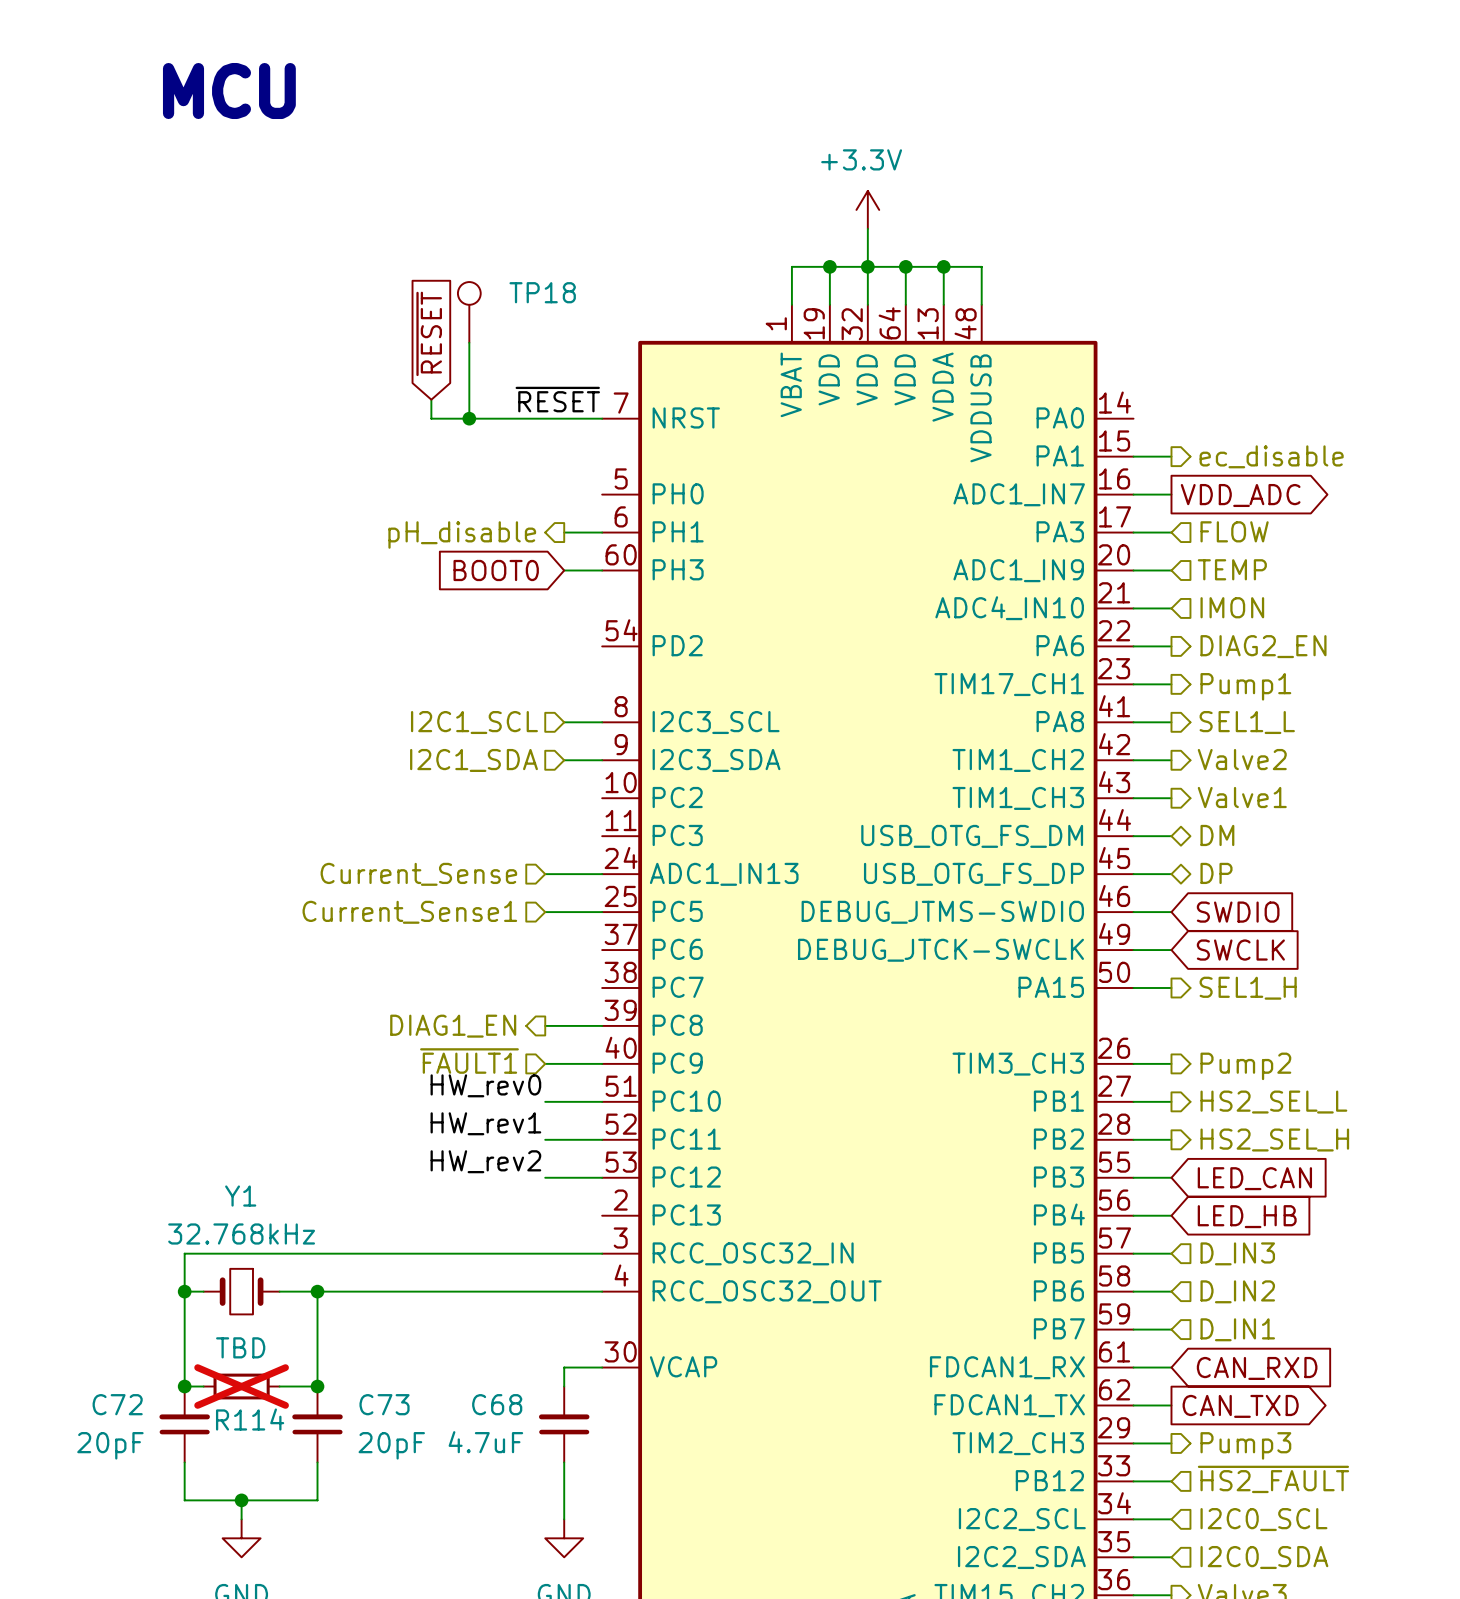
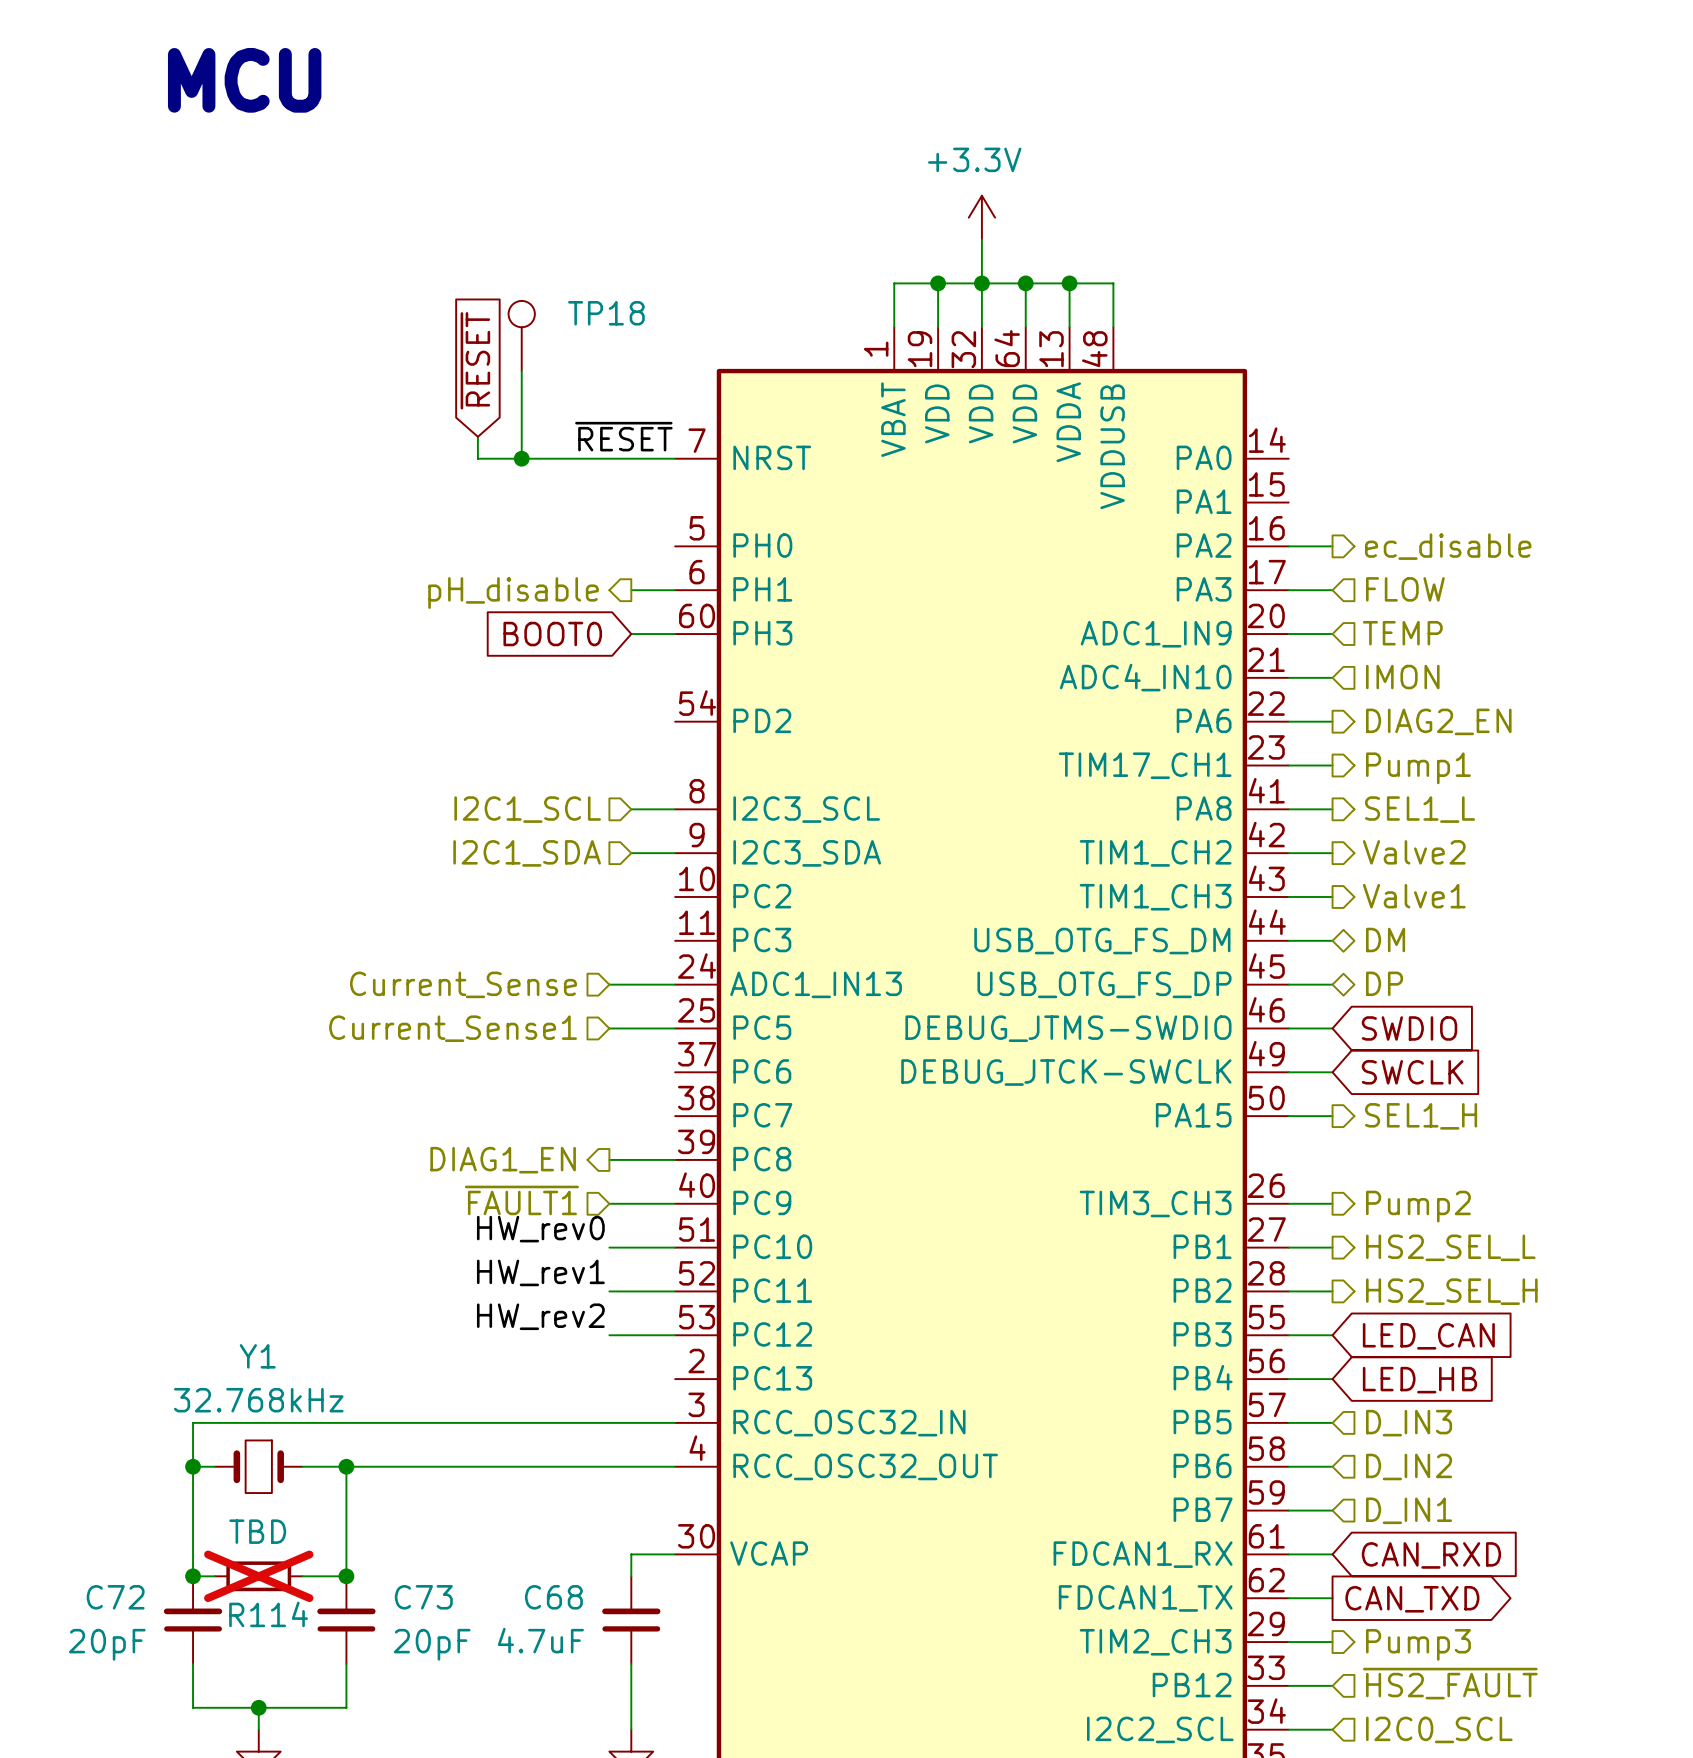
wire: (1133, 456) (1171, 456) -> none
hierarchical label position: ec_disable (1271, 456) -> ec_disable (1448, 546)
part pin name: ADC1_IN7 (1019, 494) -> PA2 (1204, 545)
global label: VDD_ADC (1240, 495) -> none

